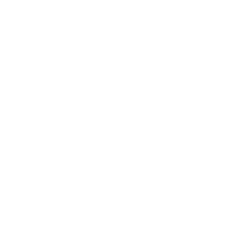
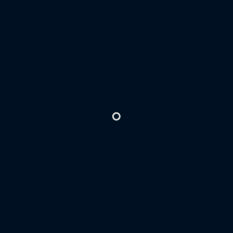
round board edge: none -> [113, 113, 120, 120]

